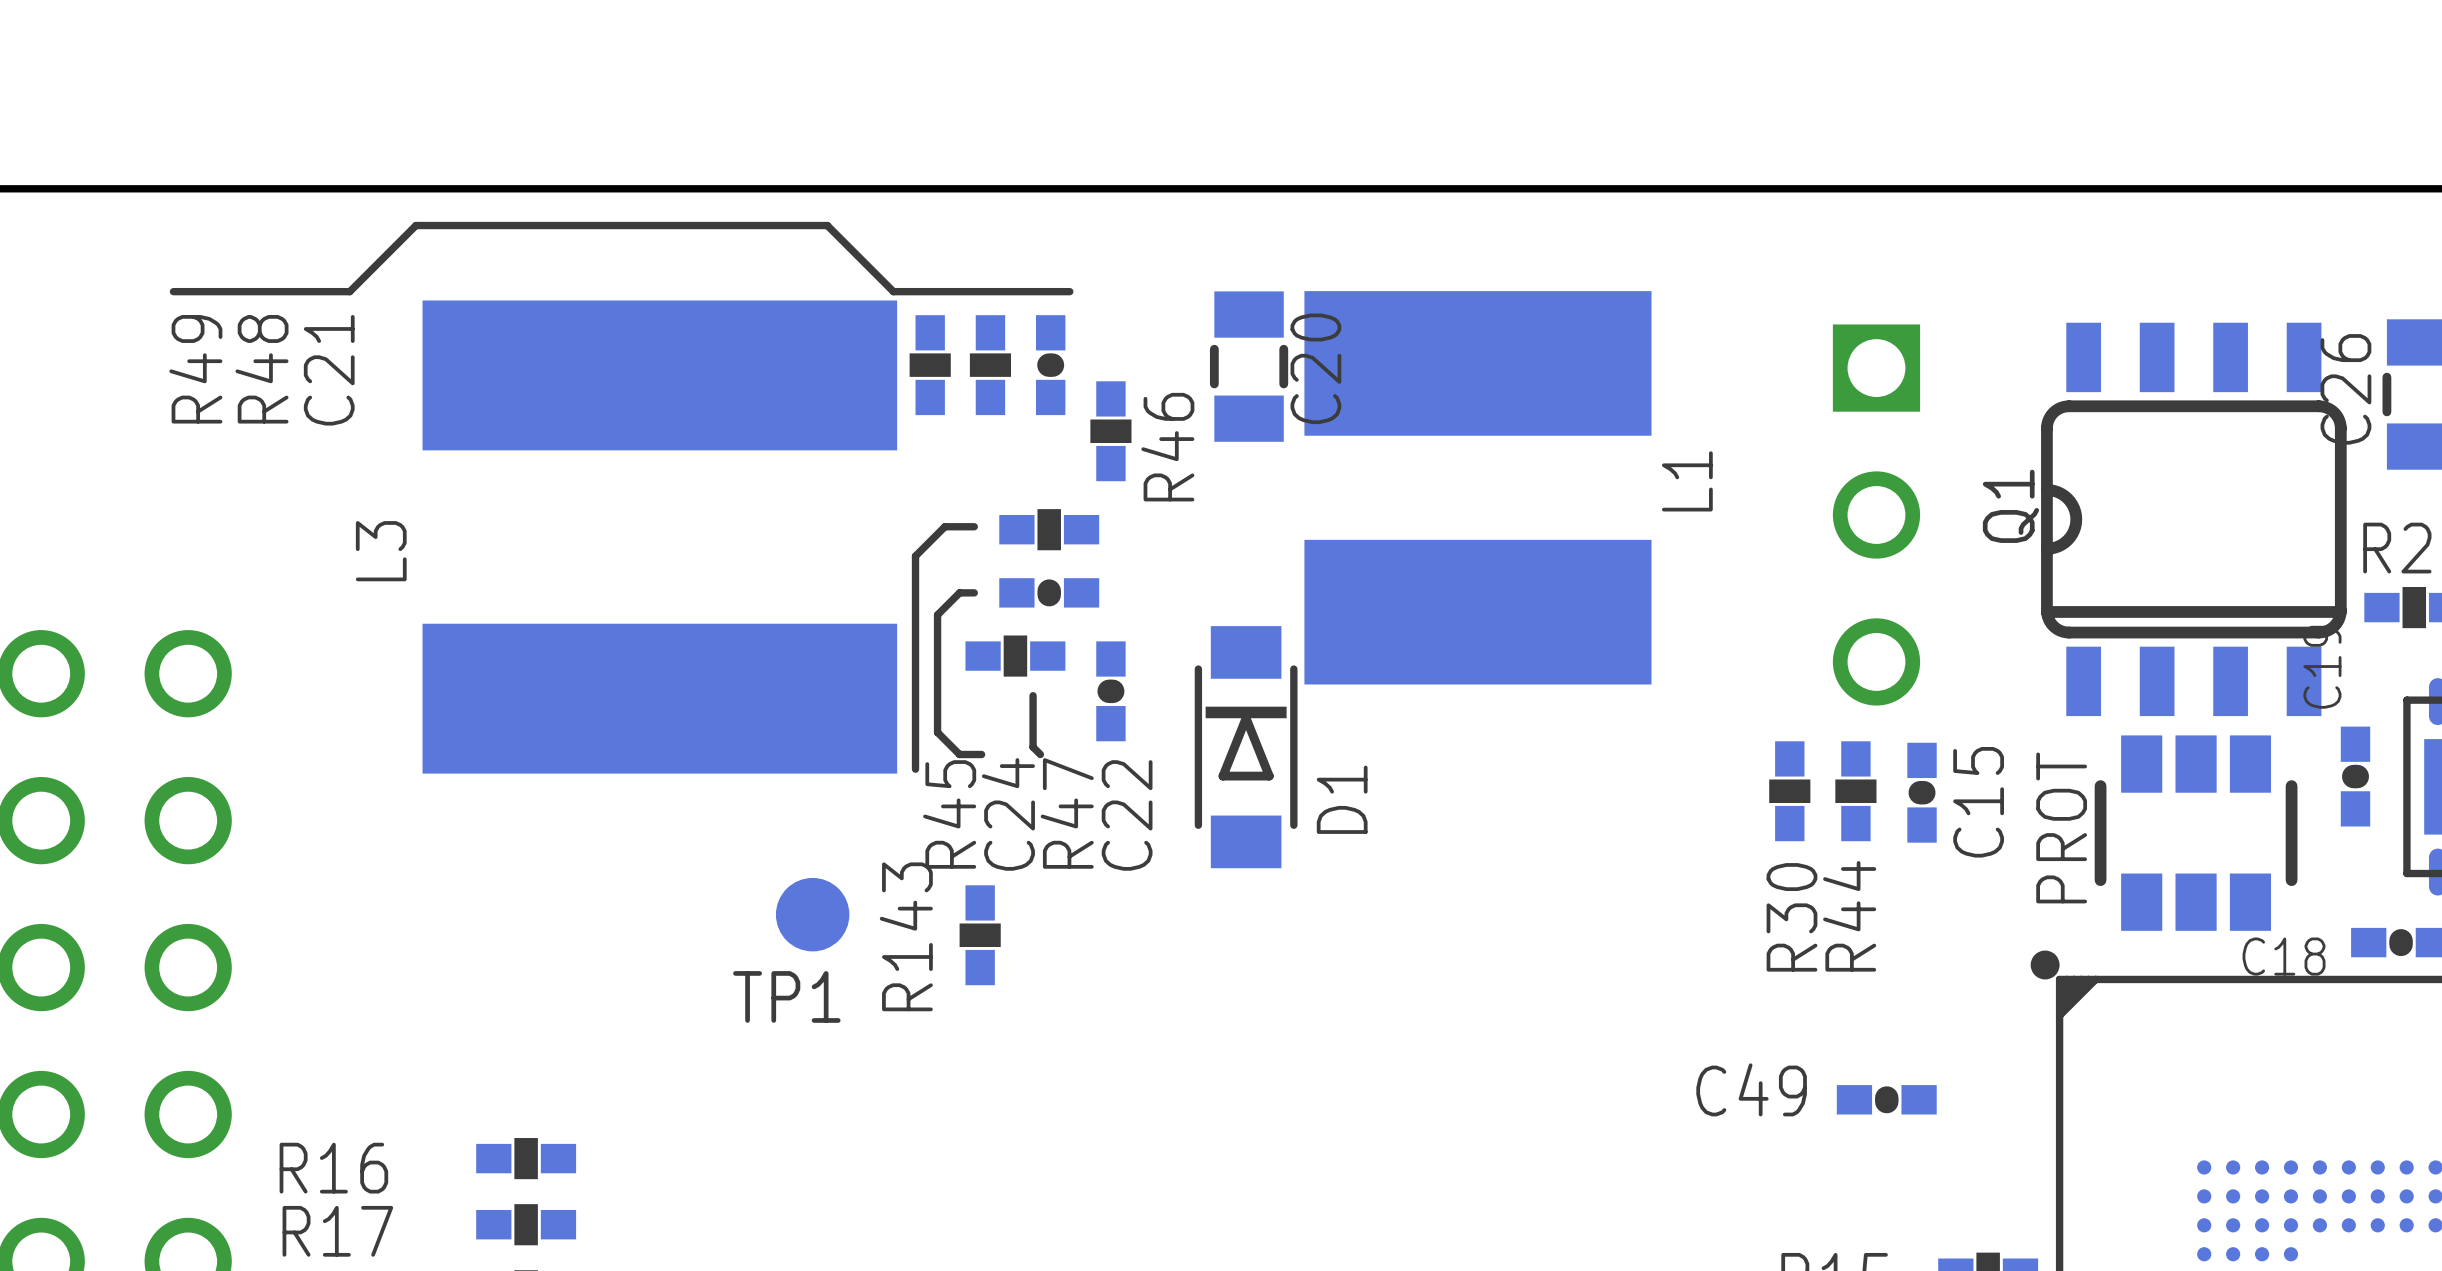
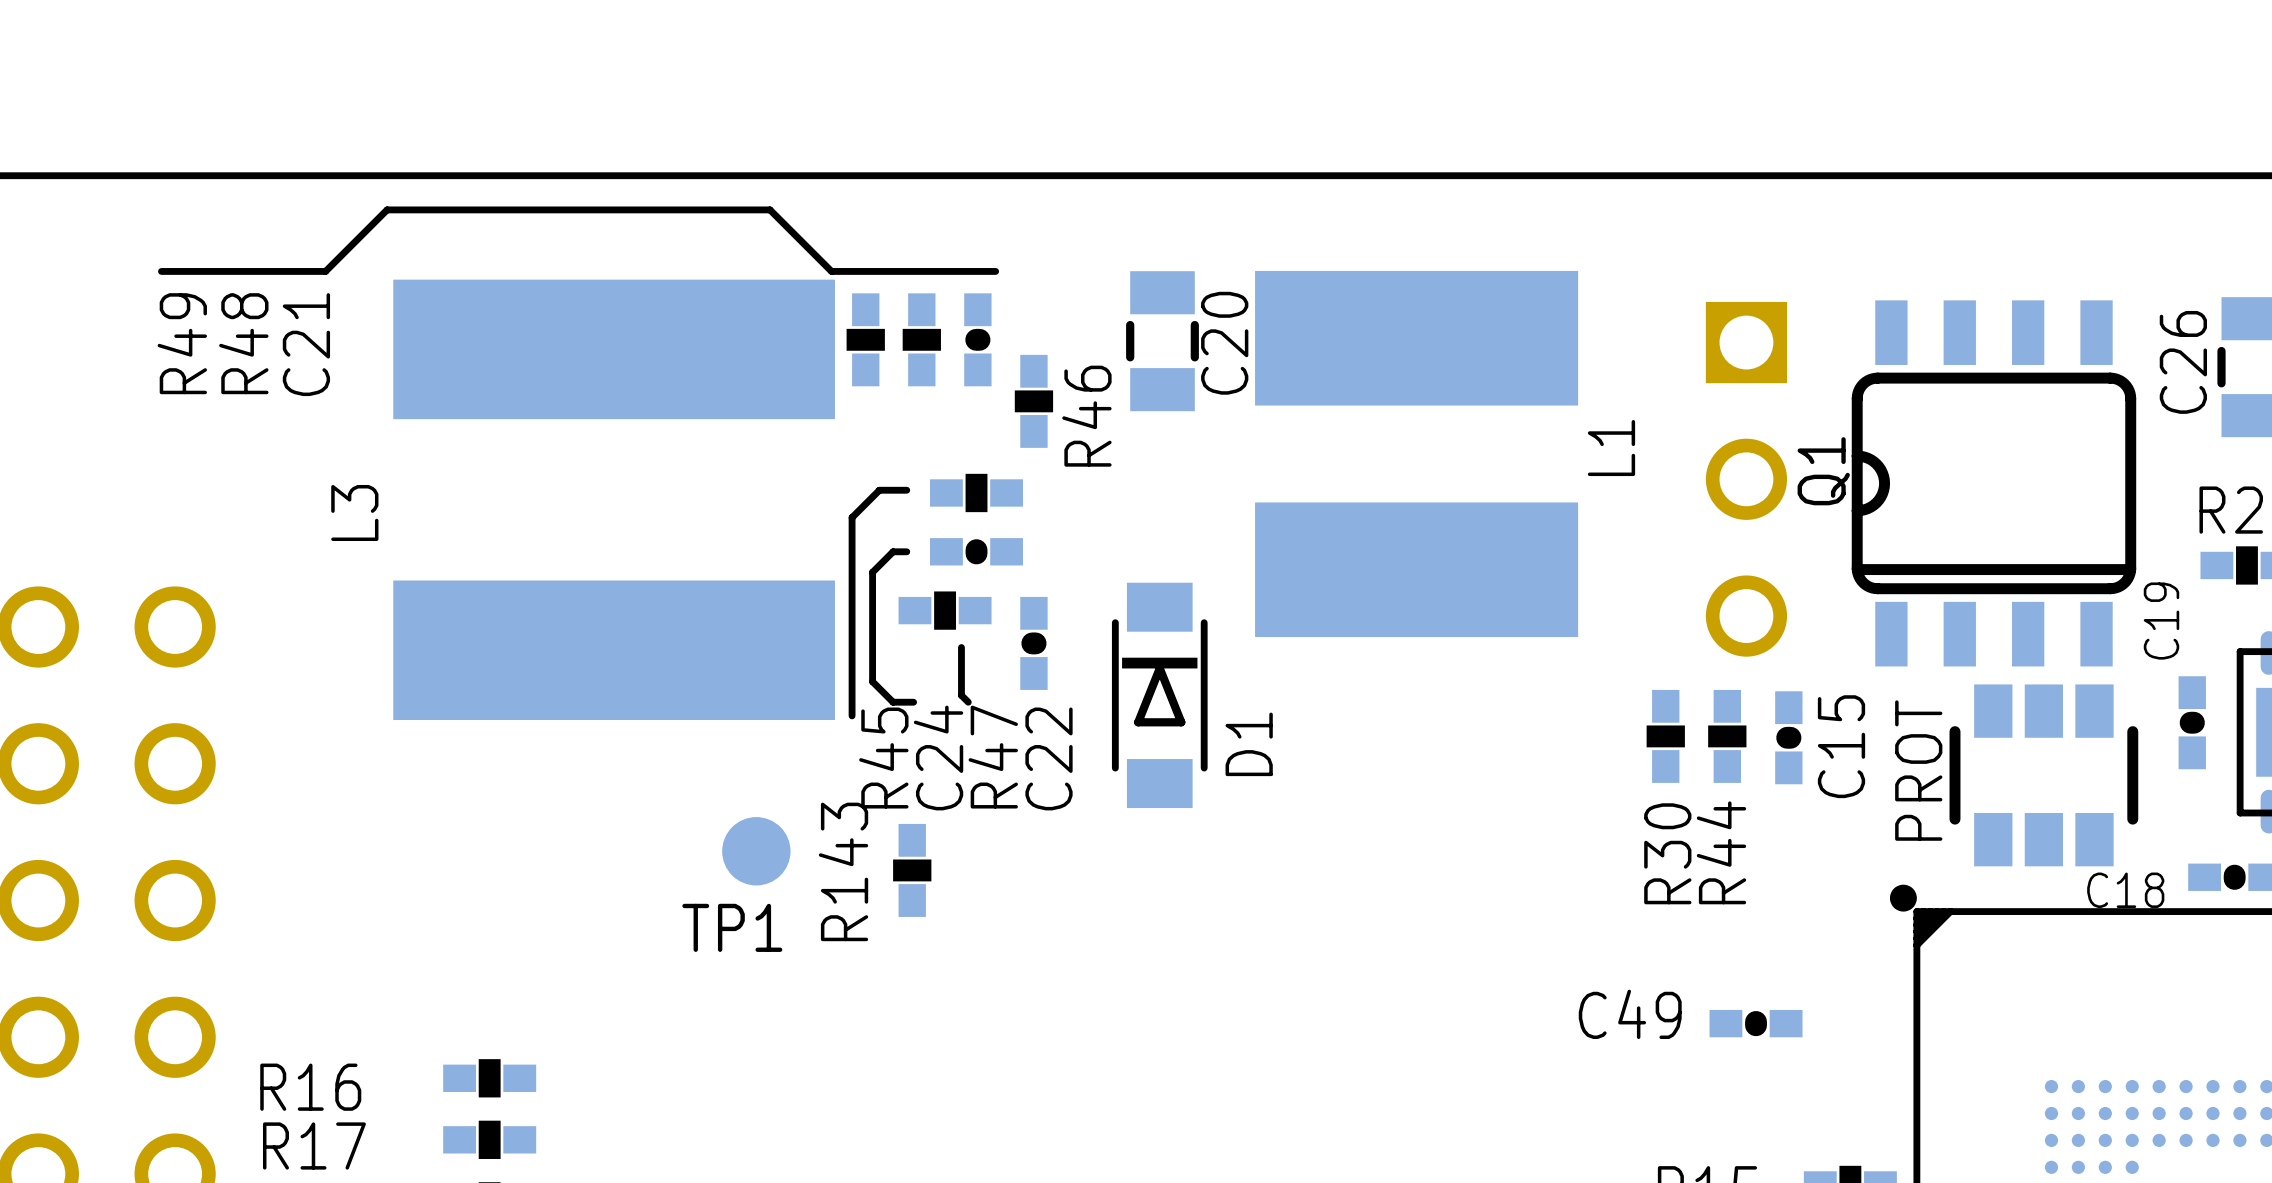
L1 position: (1477, 487) -> (1416, 453)
Q1 position: (2193, 519) -> (1993, 483)

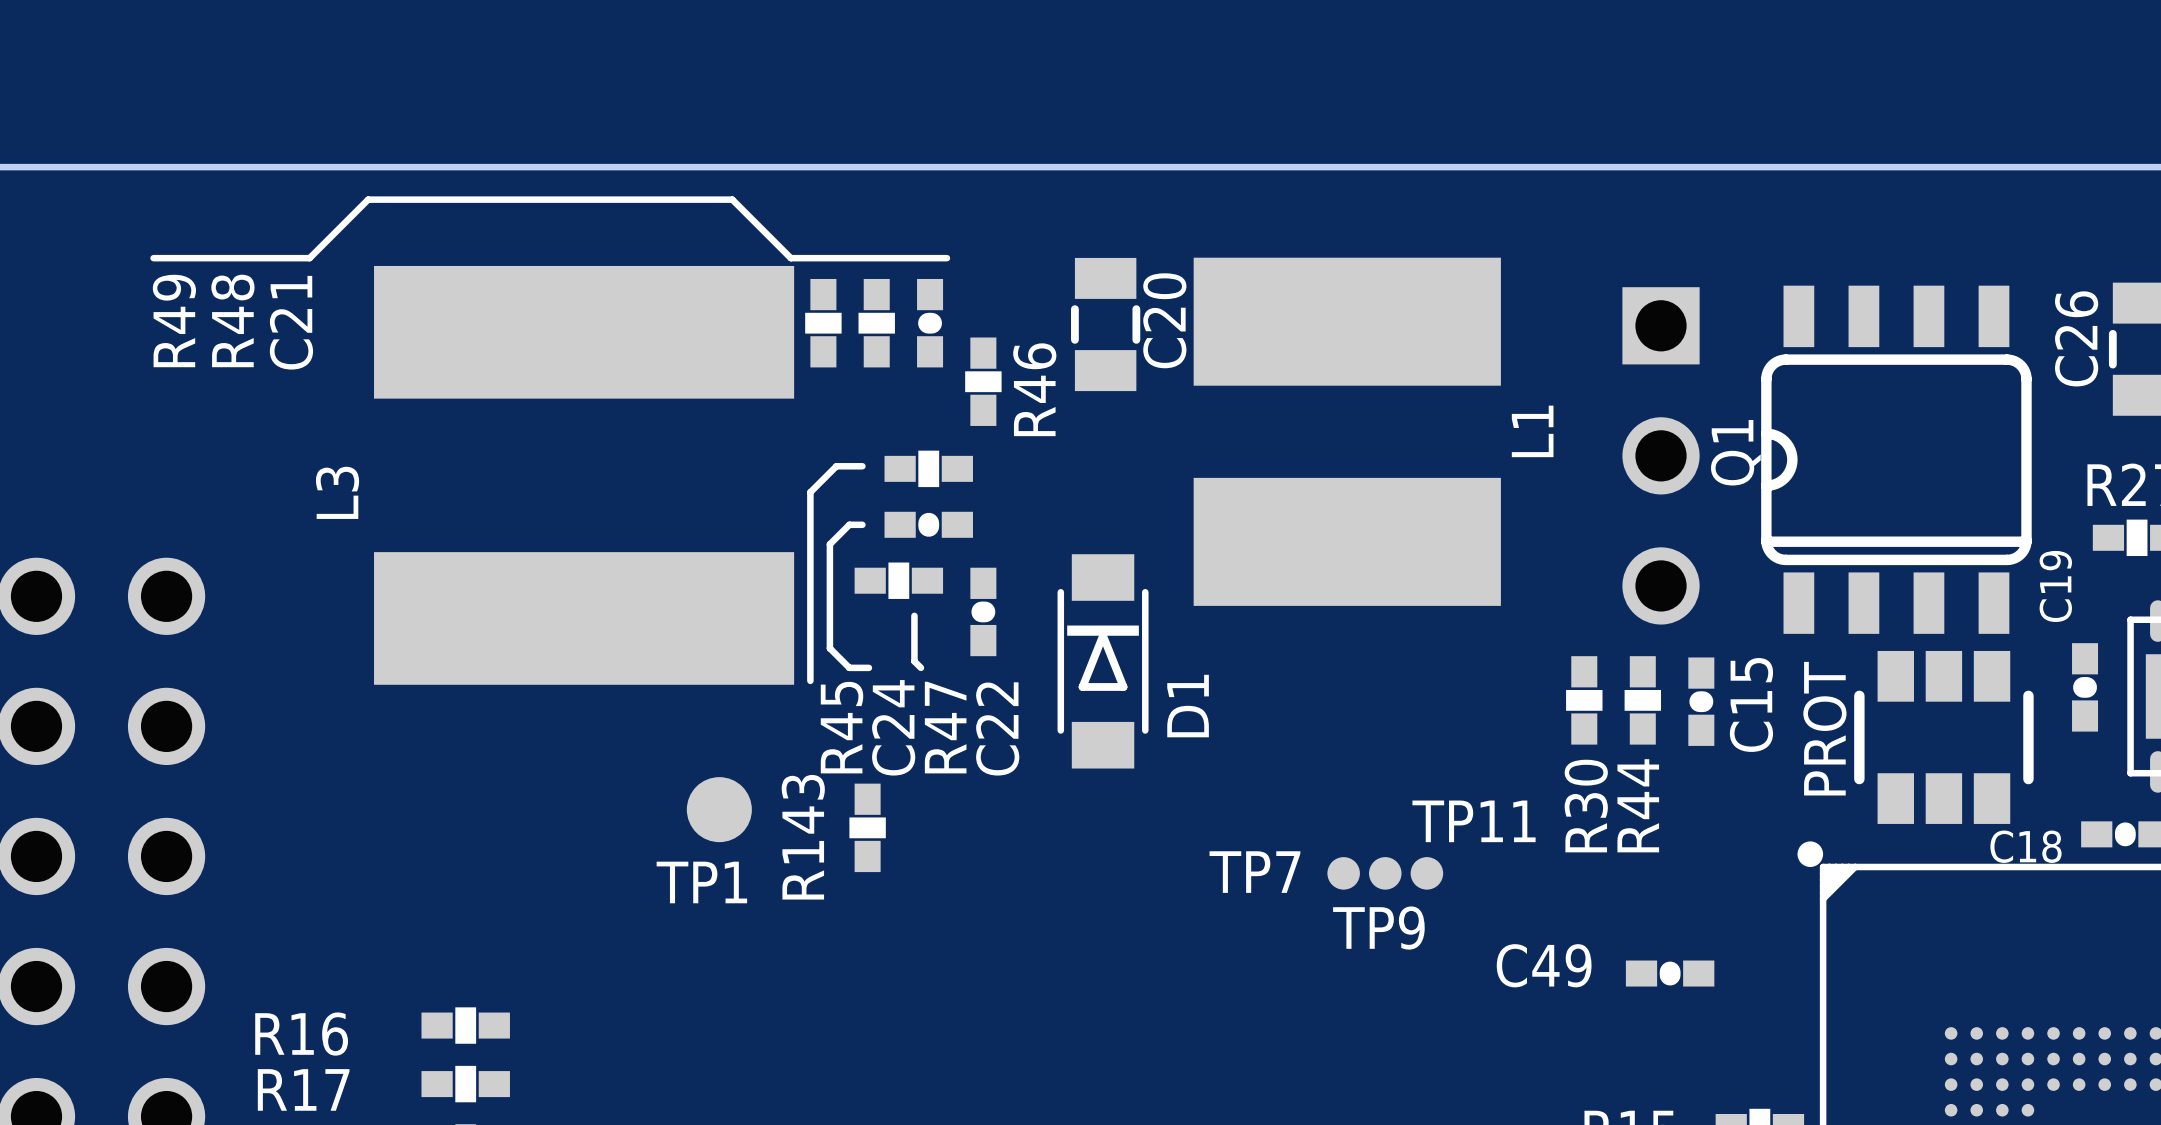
TP7: none -> (1343, 873)
TP9: none -> (1385, 873)
TP11: none -> (1426, 873)

